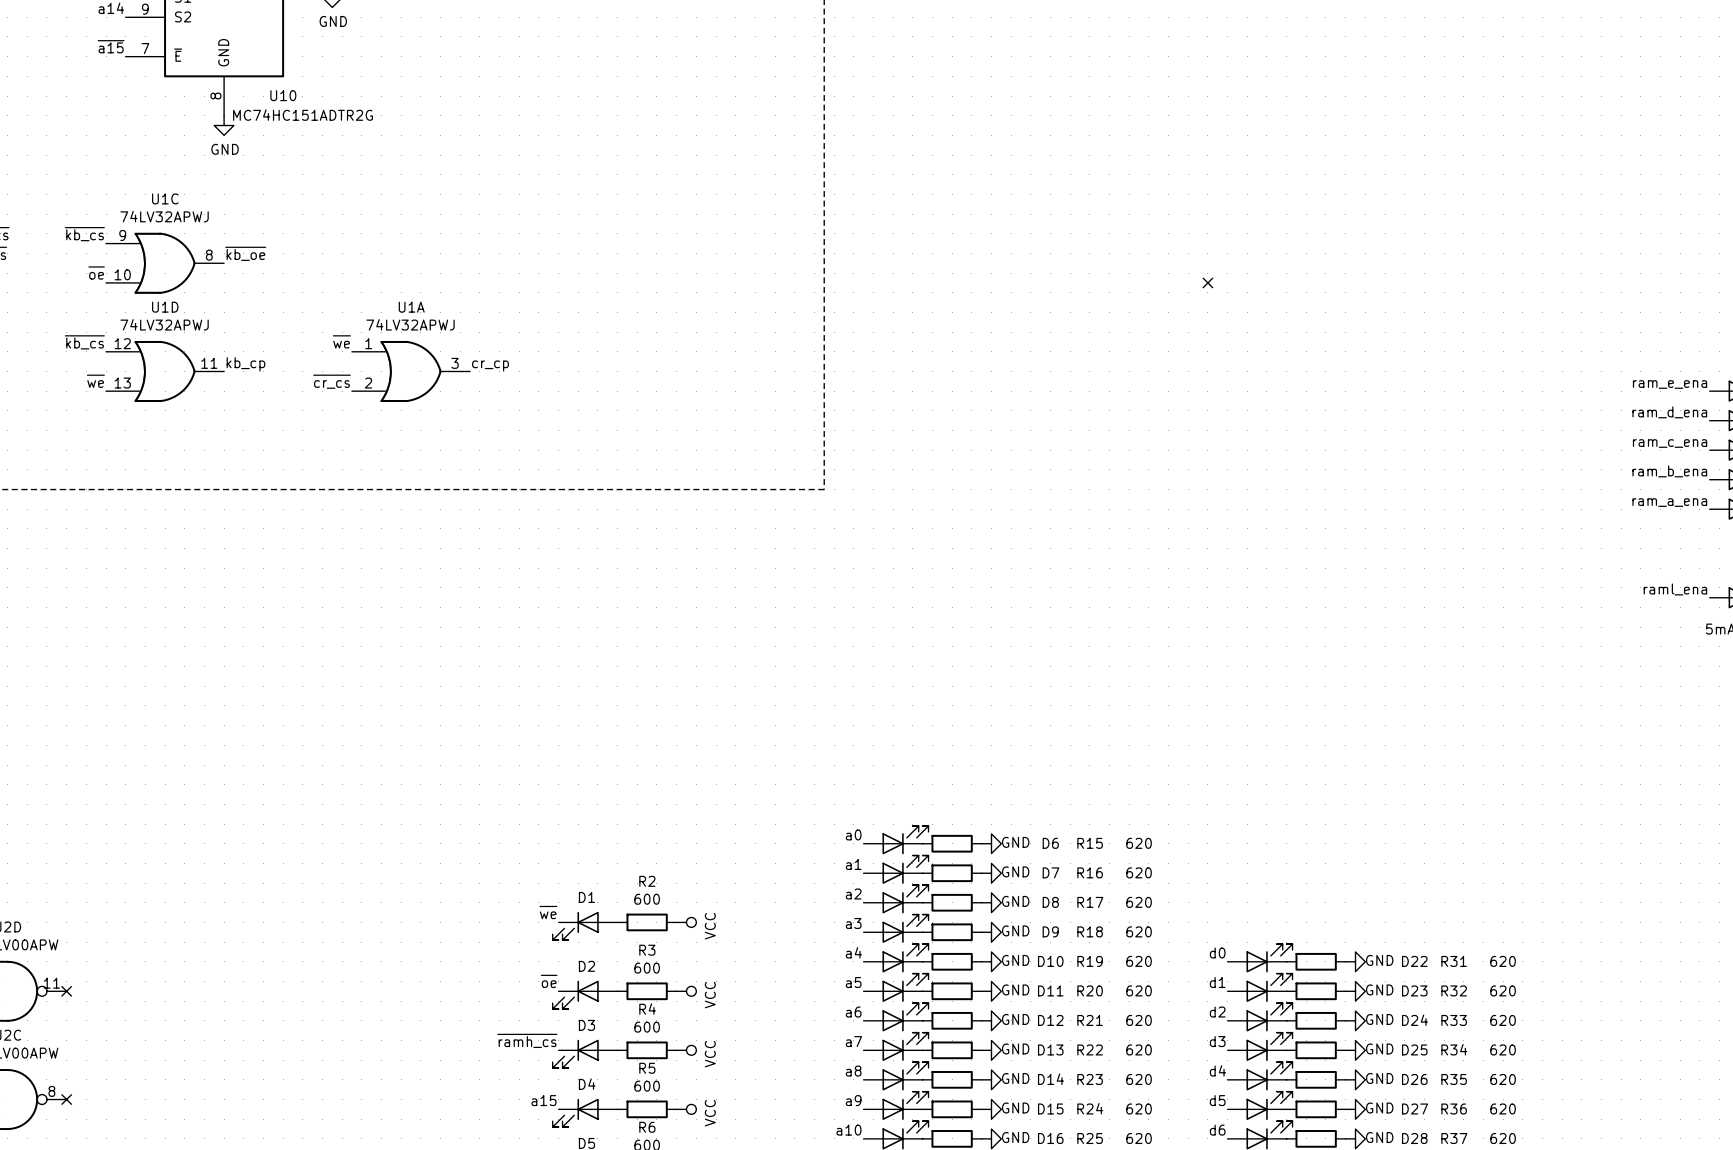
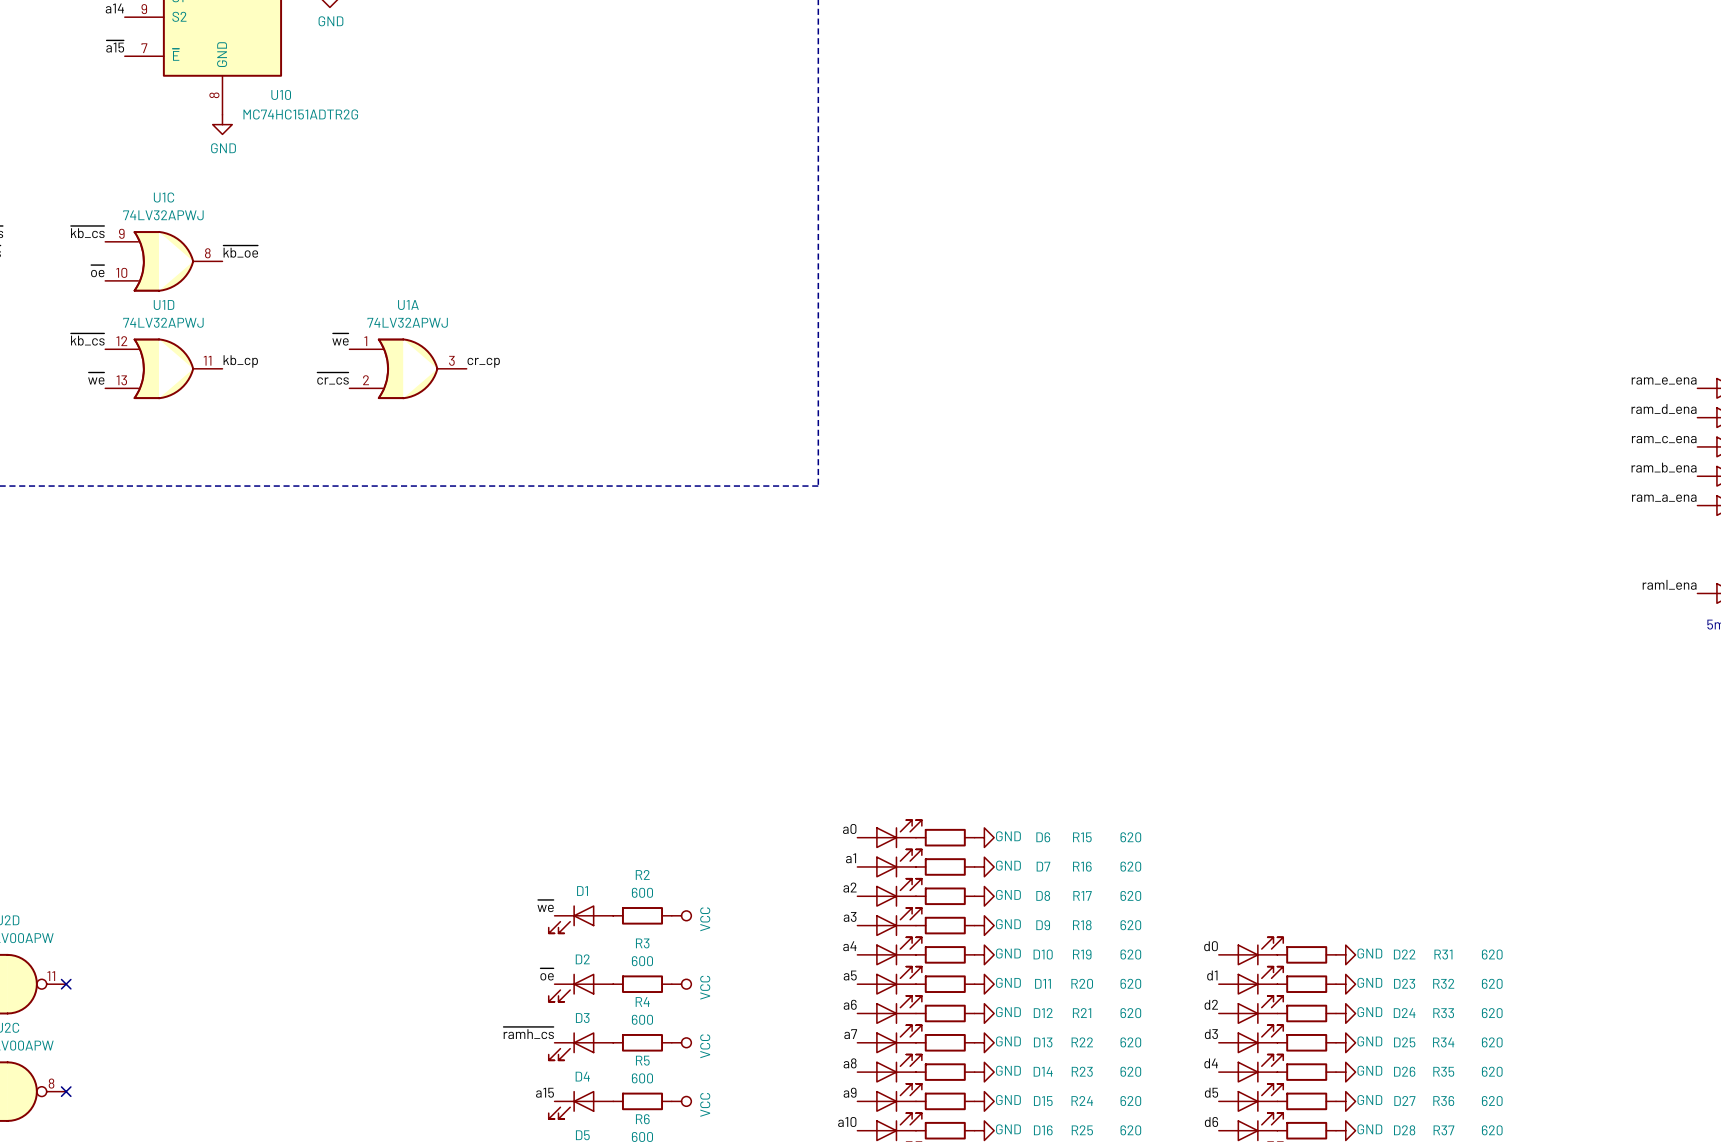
no-connect mark: (1207, 282) -> none

